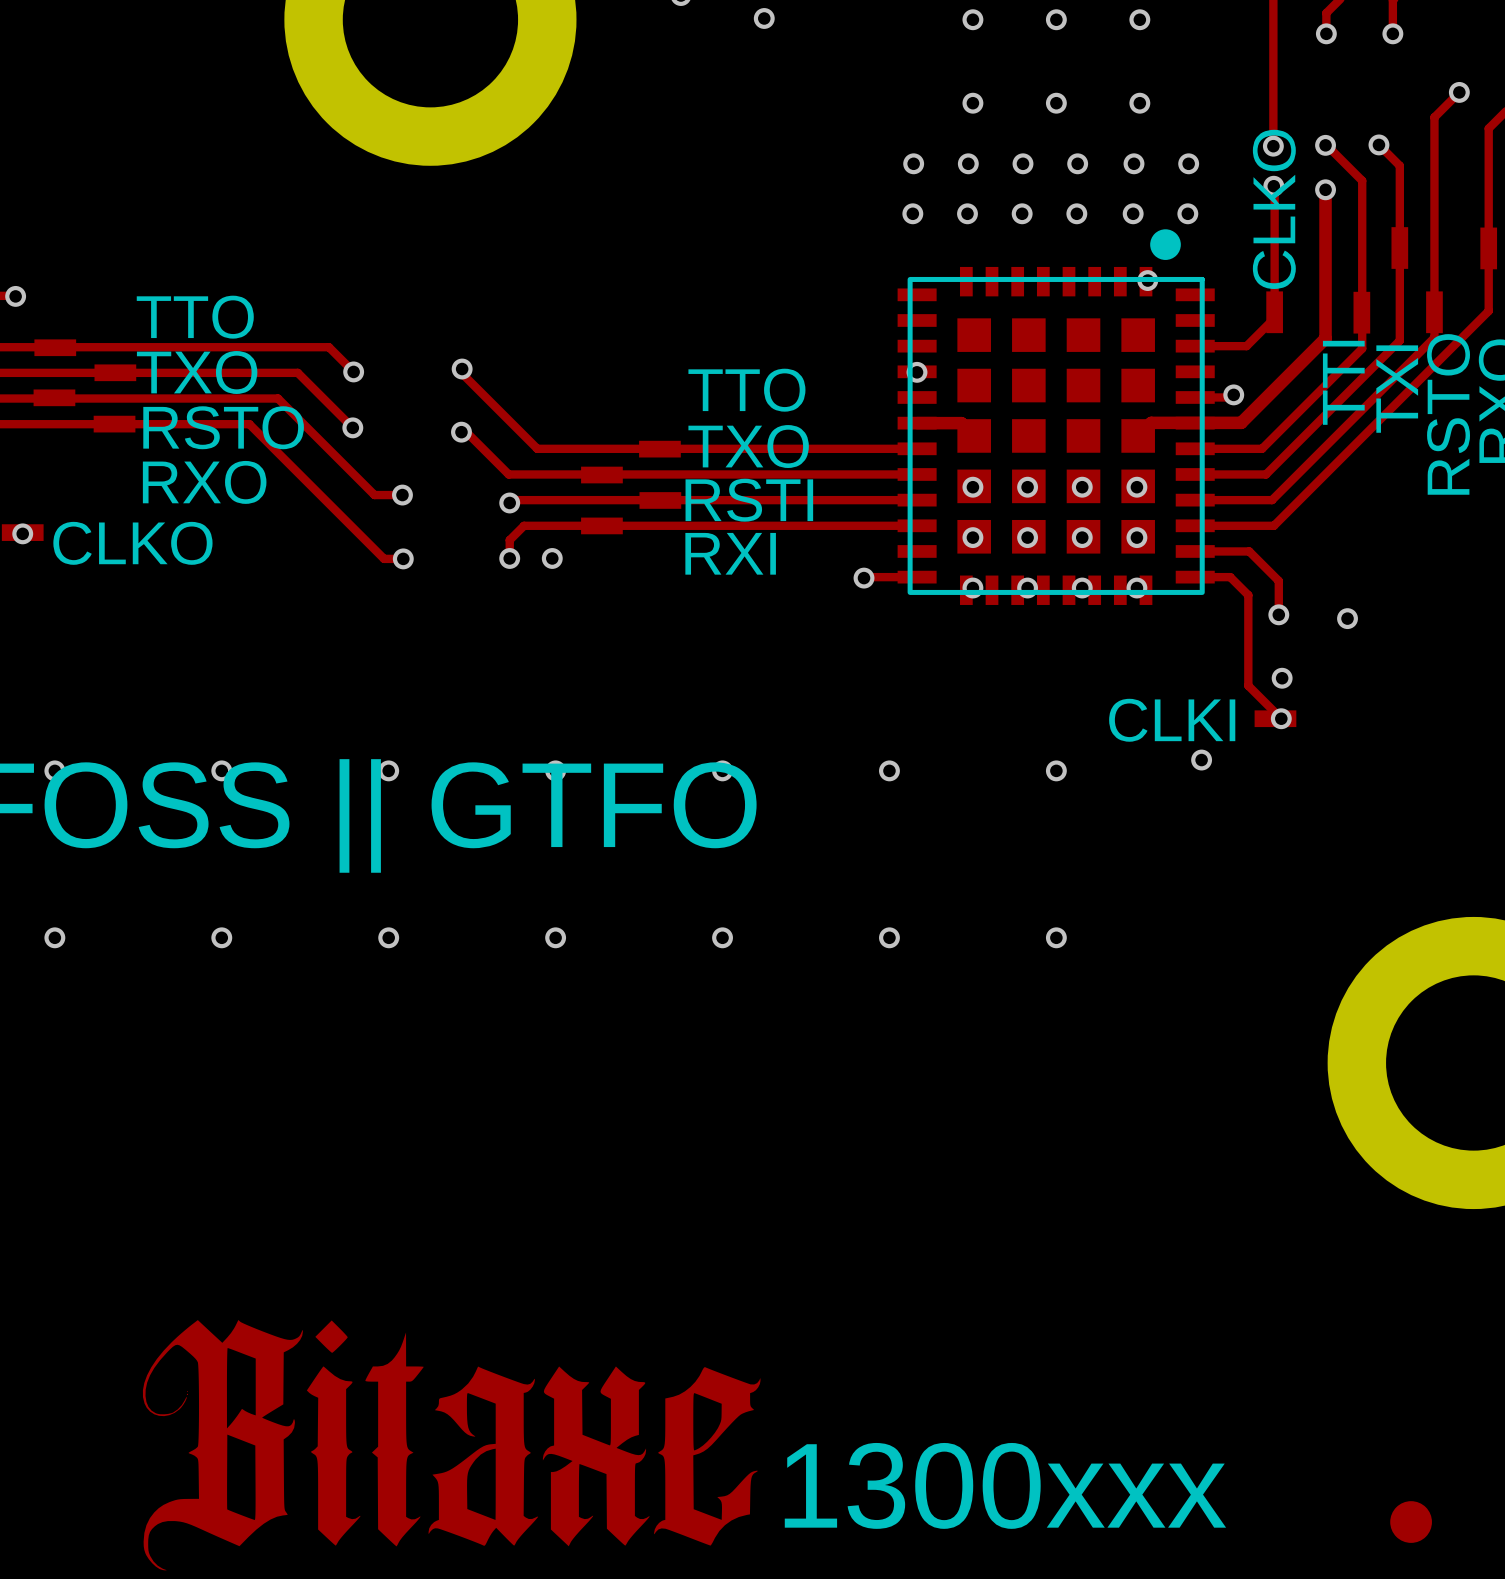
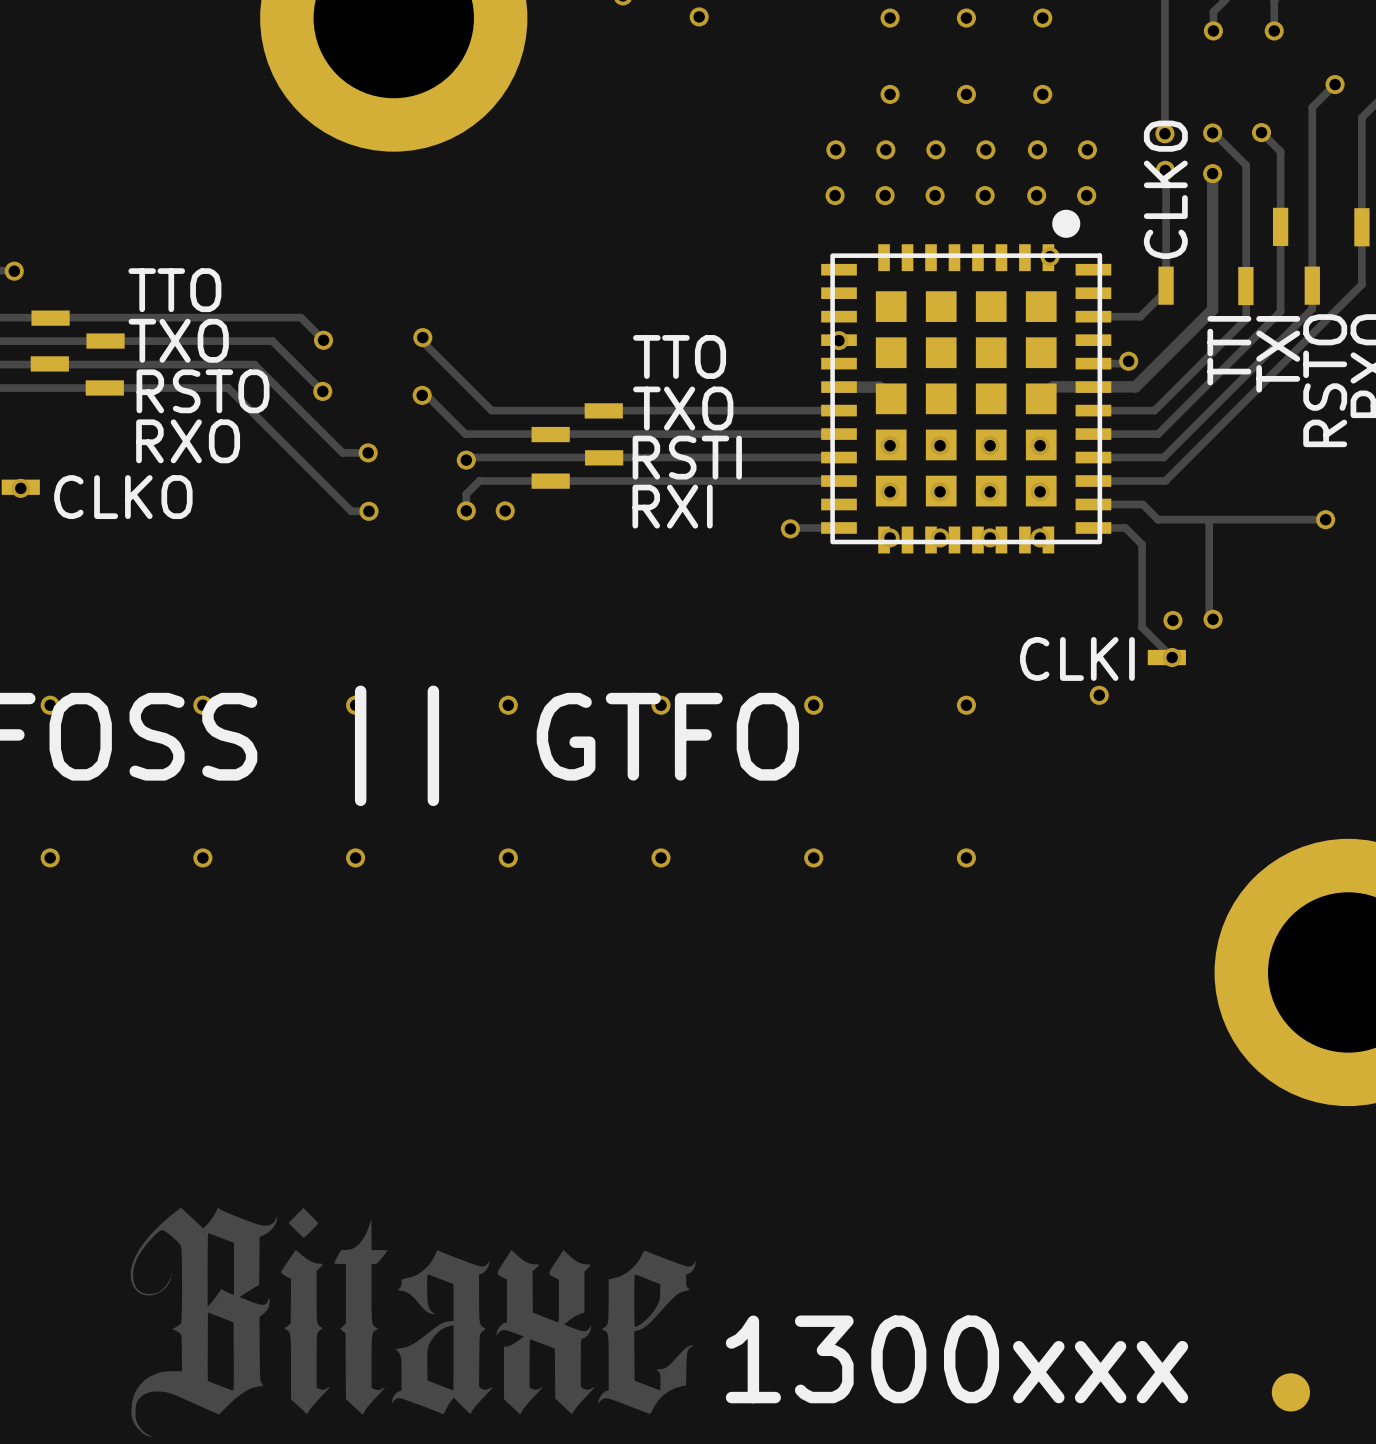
track: (1265, 568) (1278, 581) (1278, 614) -> (1158, 519) (1325, 519)
track: none -> (1209, 519) (1209, 615) (1213, 619)
via: none -> (1325, 519)
via: (1278, 614) -> none
via: (1347, 618) -> none
via: none -> (1213, 619)

